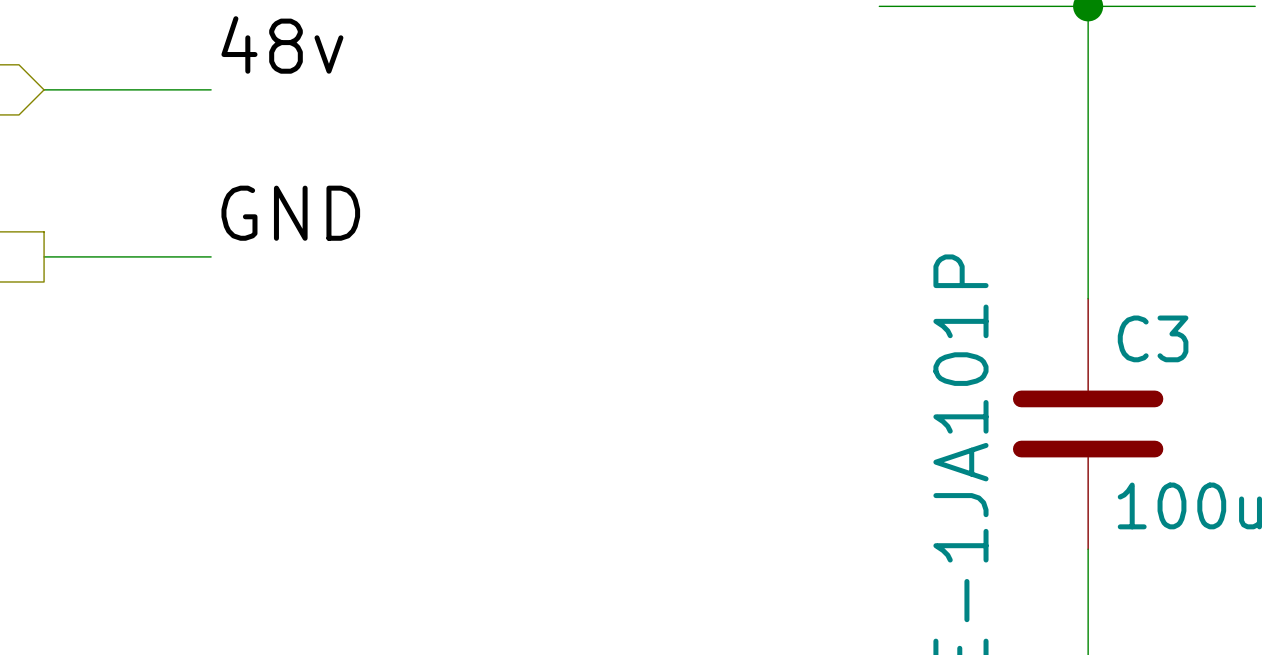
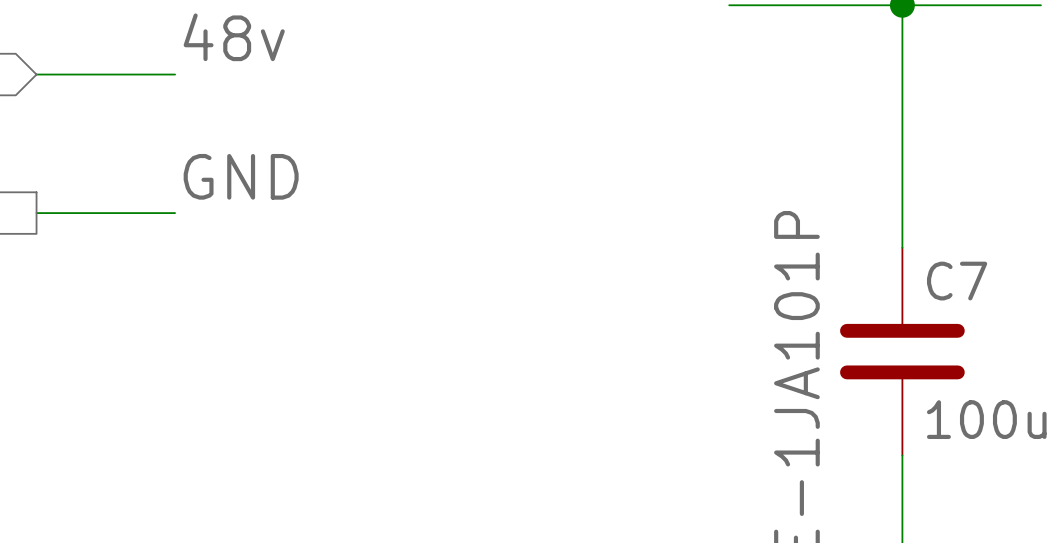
C3 name: C3 (1153, 338) -> C7 (957, 281)

